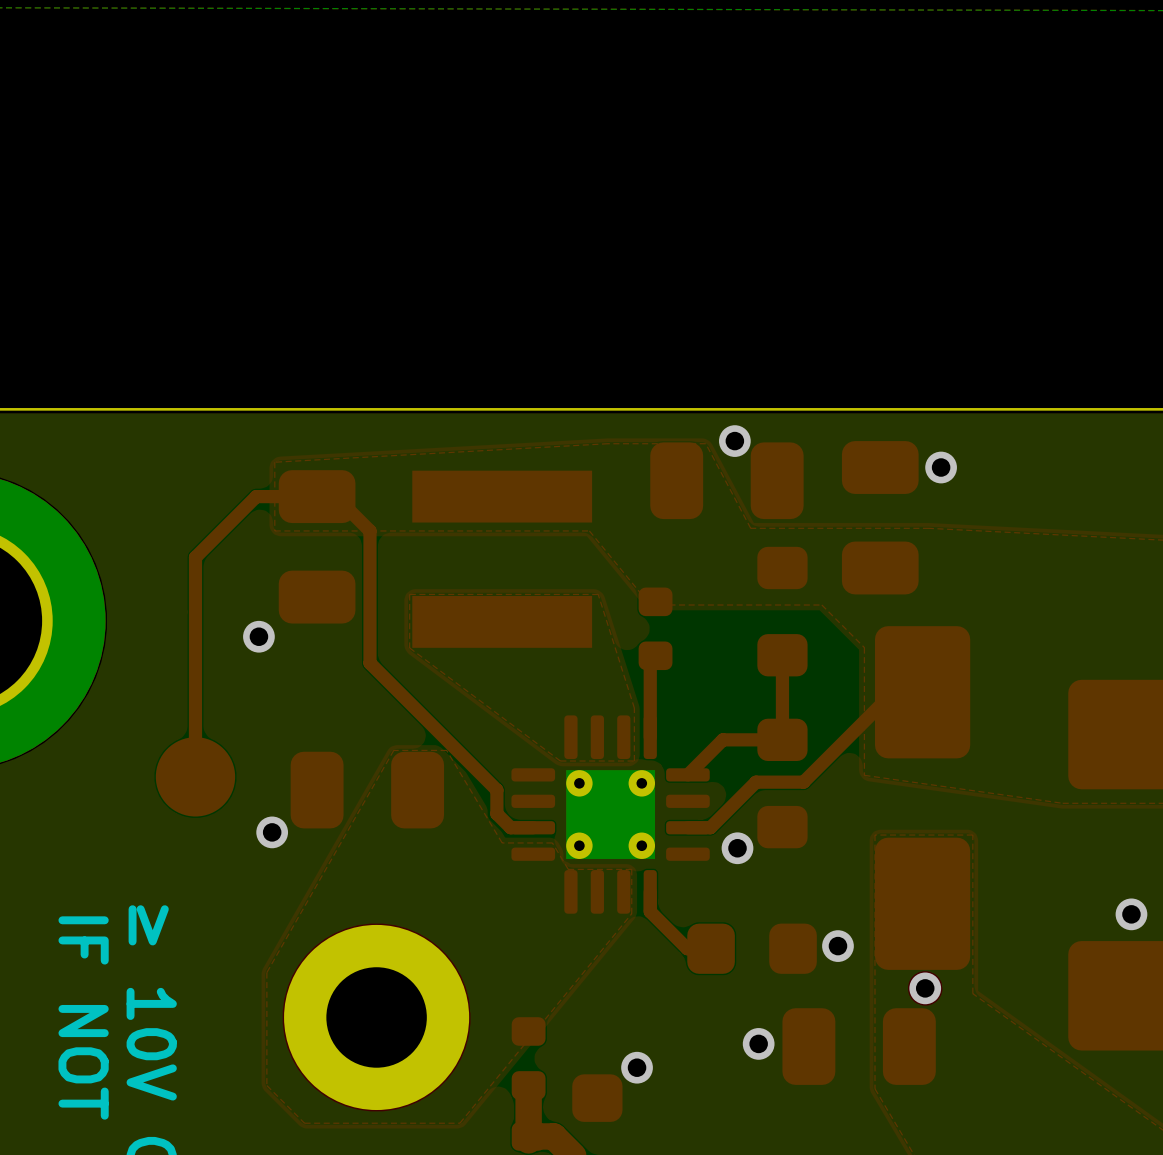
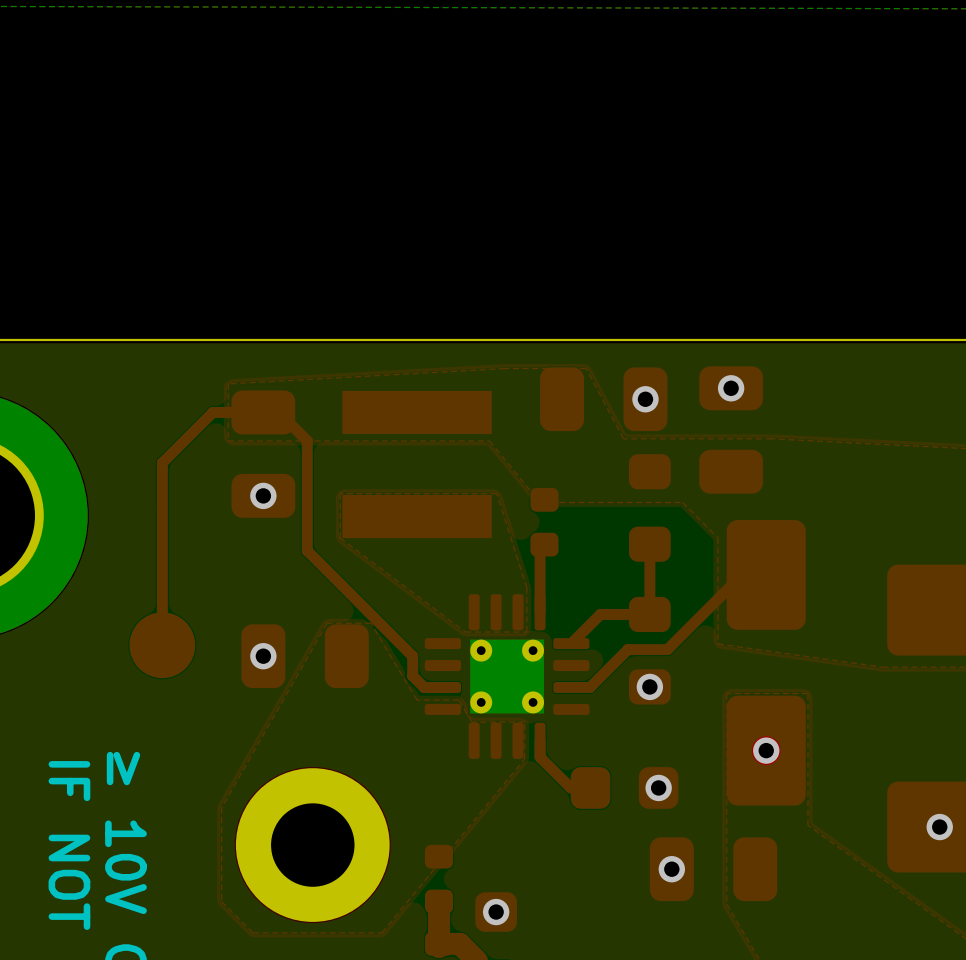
via position: (734, 441) -> (645, 399)
via position: (941, 467) -> (731, 388)
via position: (258, 636) -> (263, 495)
via position: (272, 832) -> (263, 656)
via position: (737, 848) -> (649, 686)
via: none -> (766, 750)
via position: (1131, 914) -> (939, 827)
via position: (837, 946) -> (658, 787)
via: (925, 988) -> none
via: (758, 1043) -> none
via: none -> (671, 869)
via position: (637, 1067) -> (496, 912)

